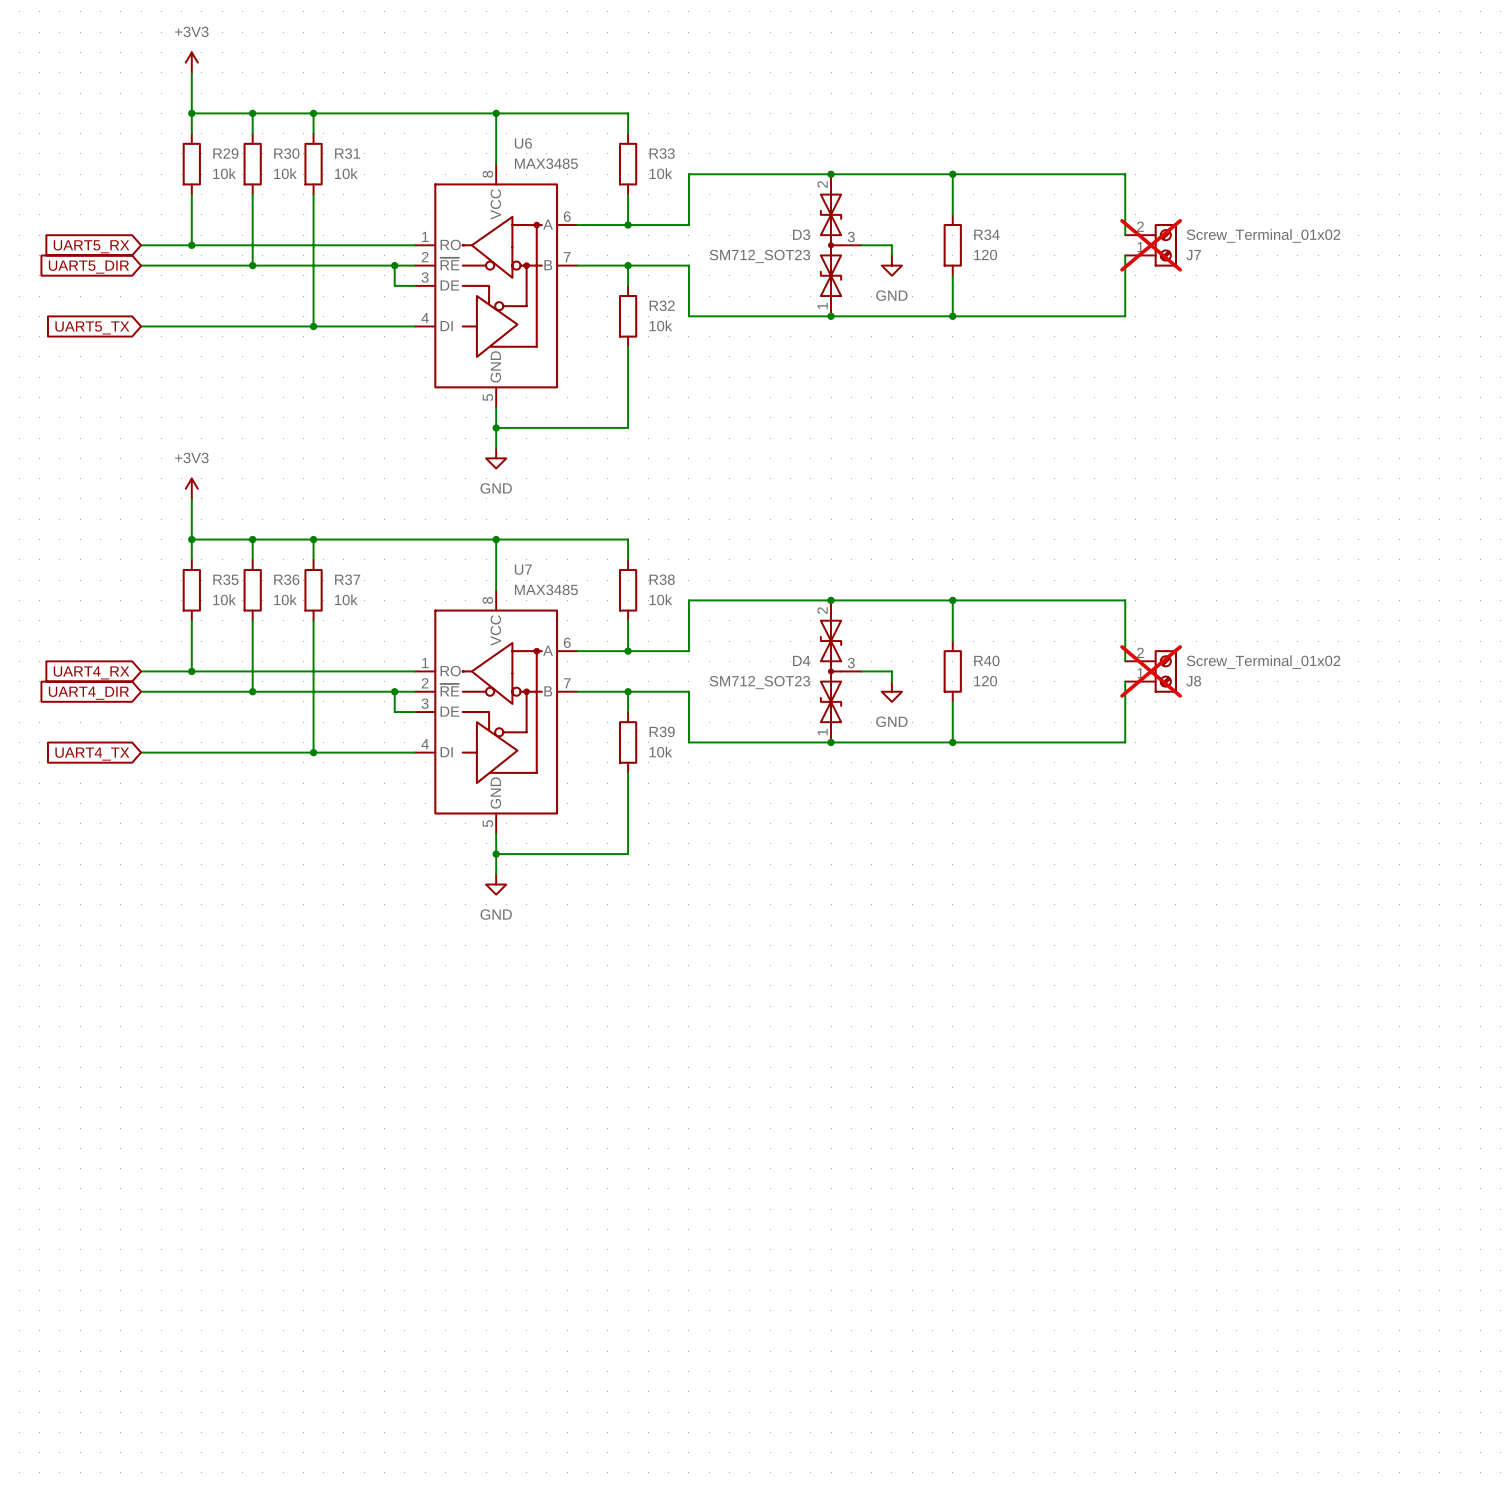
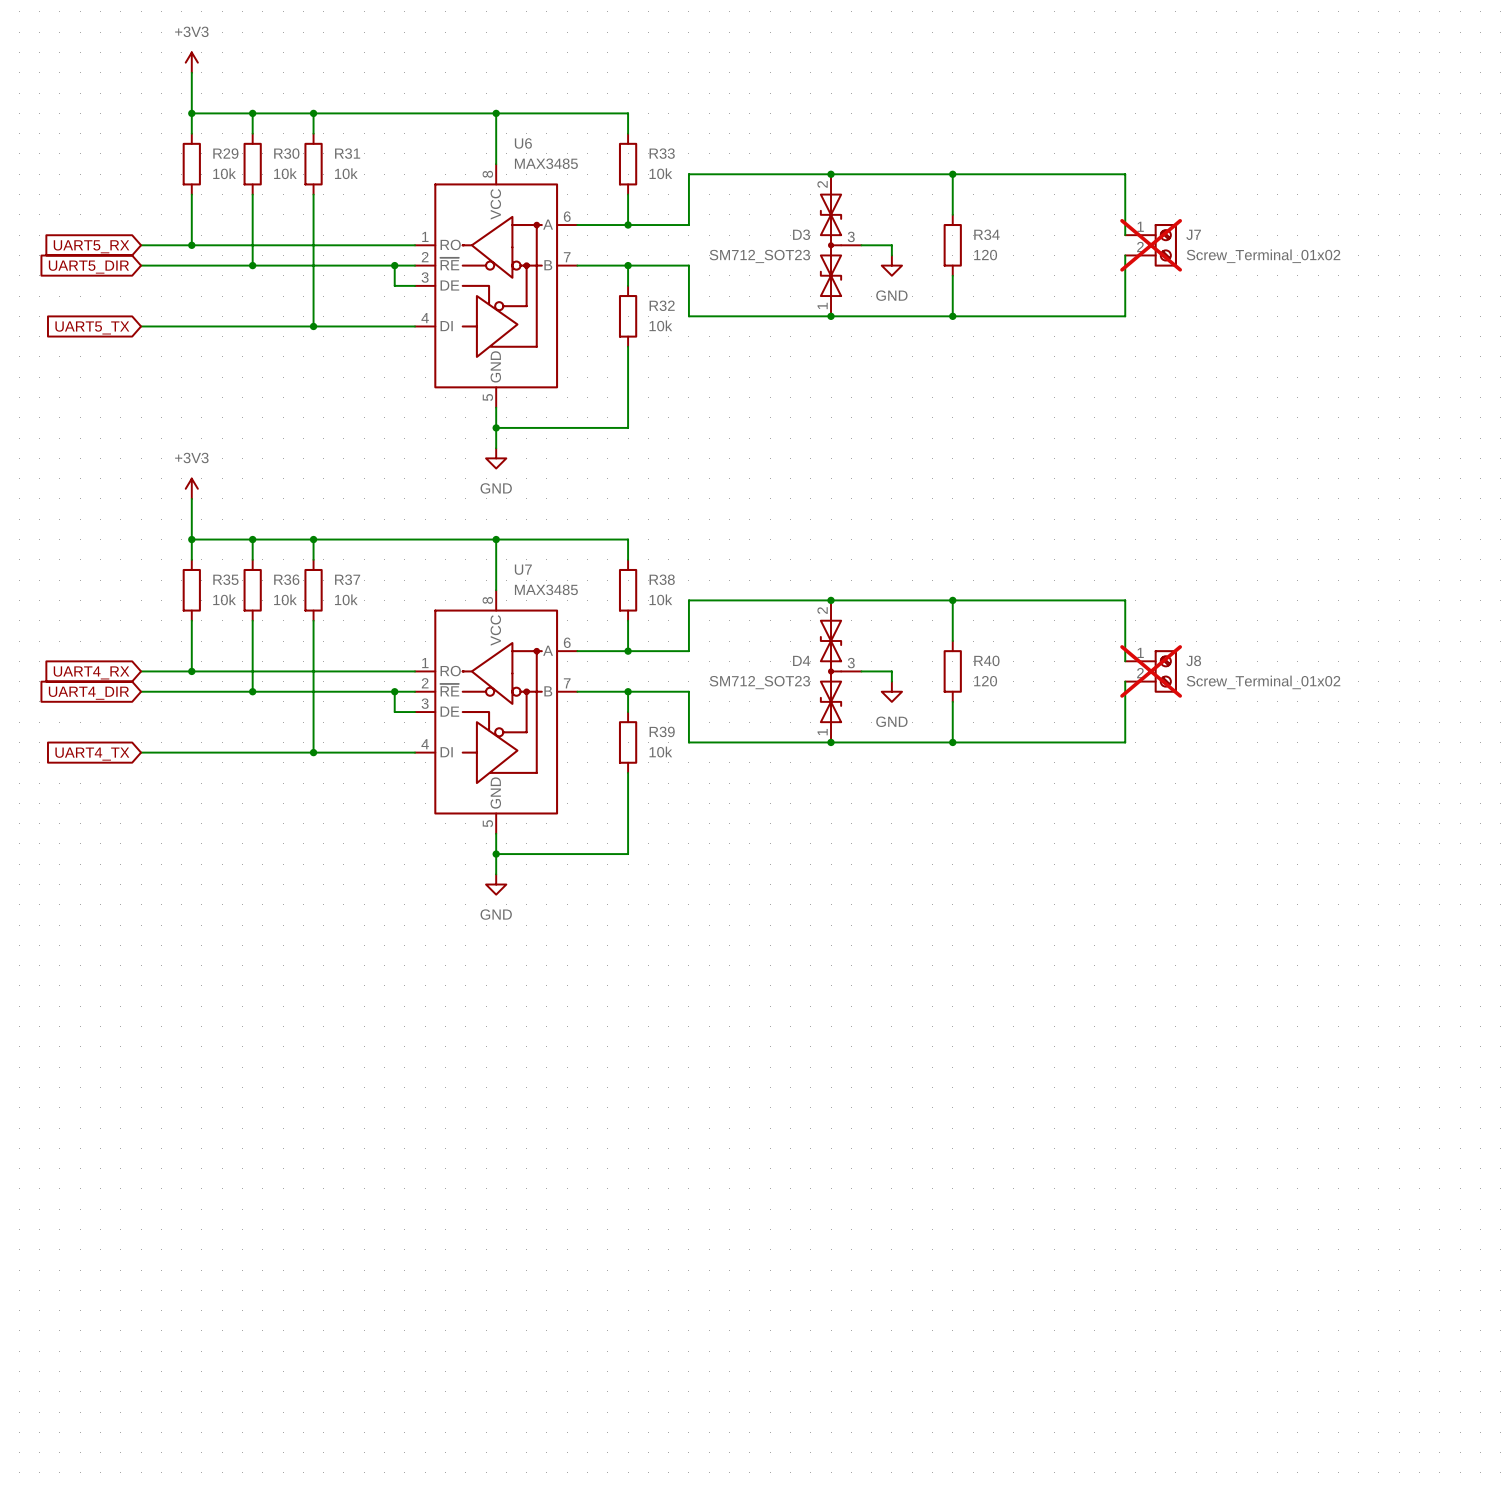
J7 flip: as is (1165, 245) -> up-down (1165, 245)
J8 flip: as is (1165, 671) -> up-down (1165, 671)

